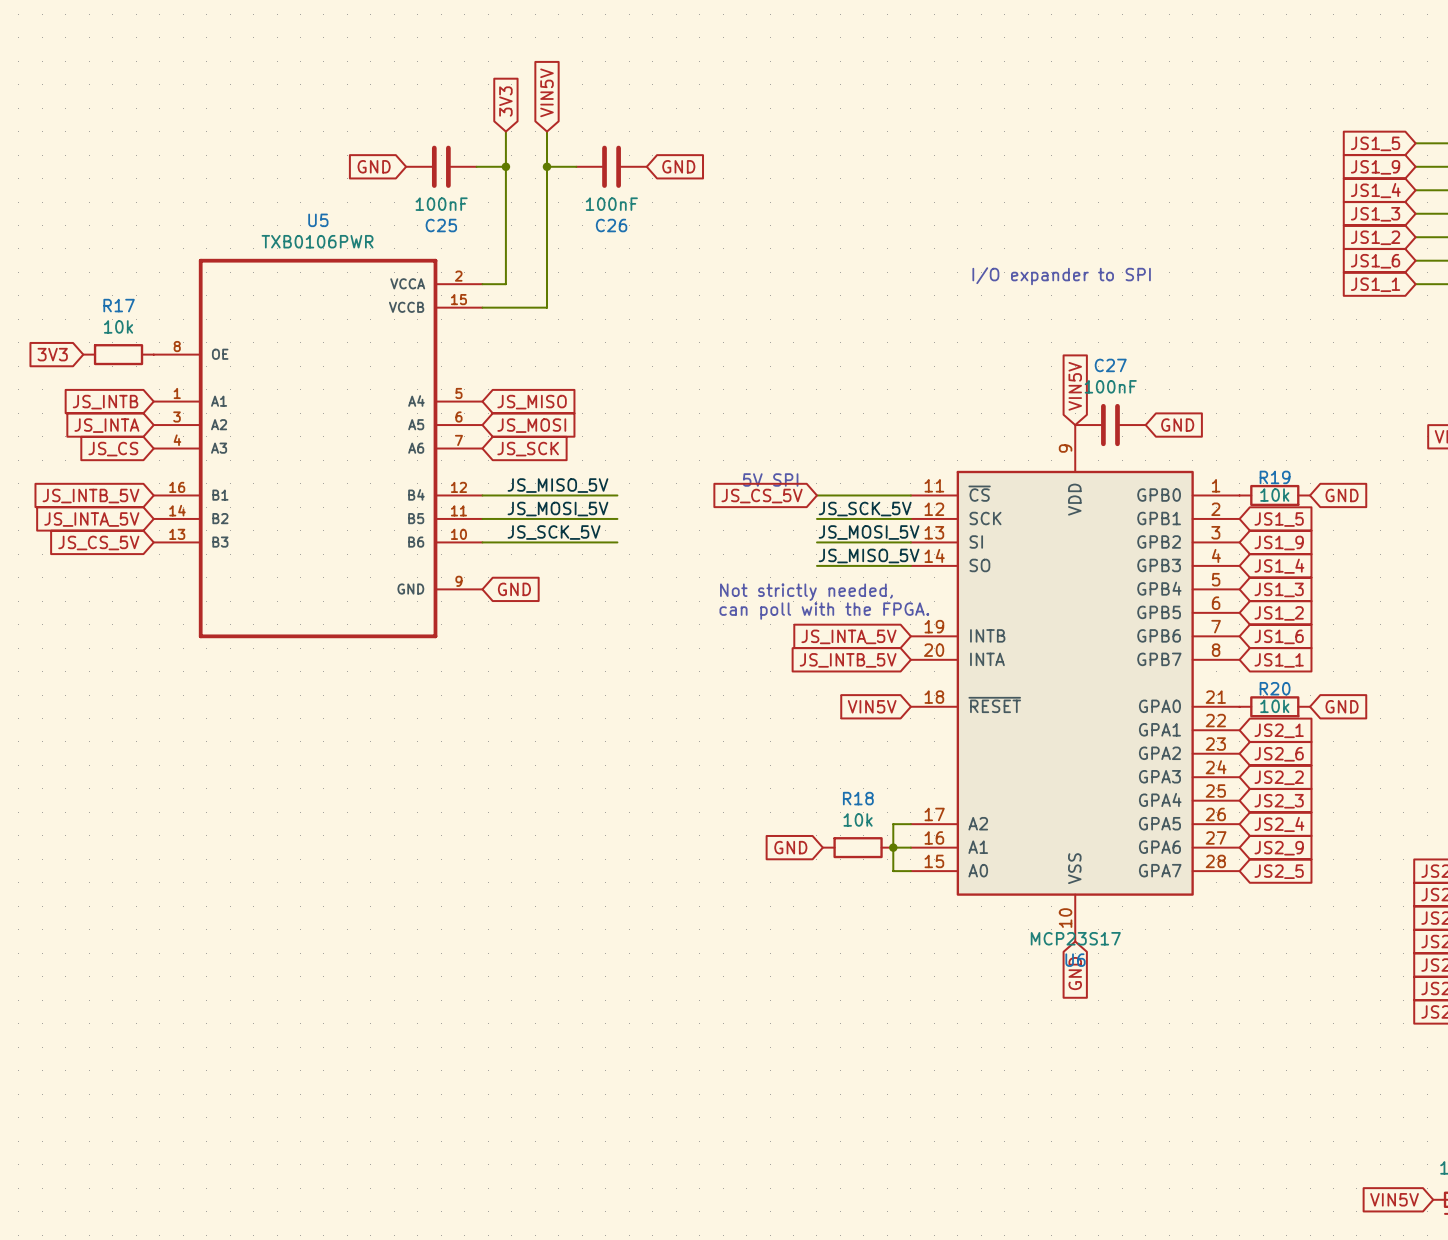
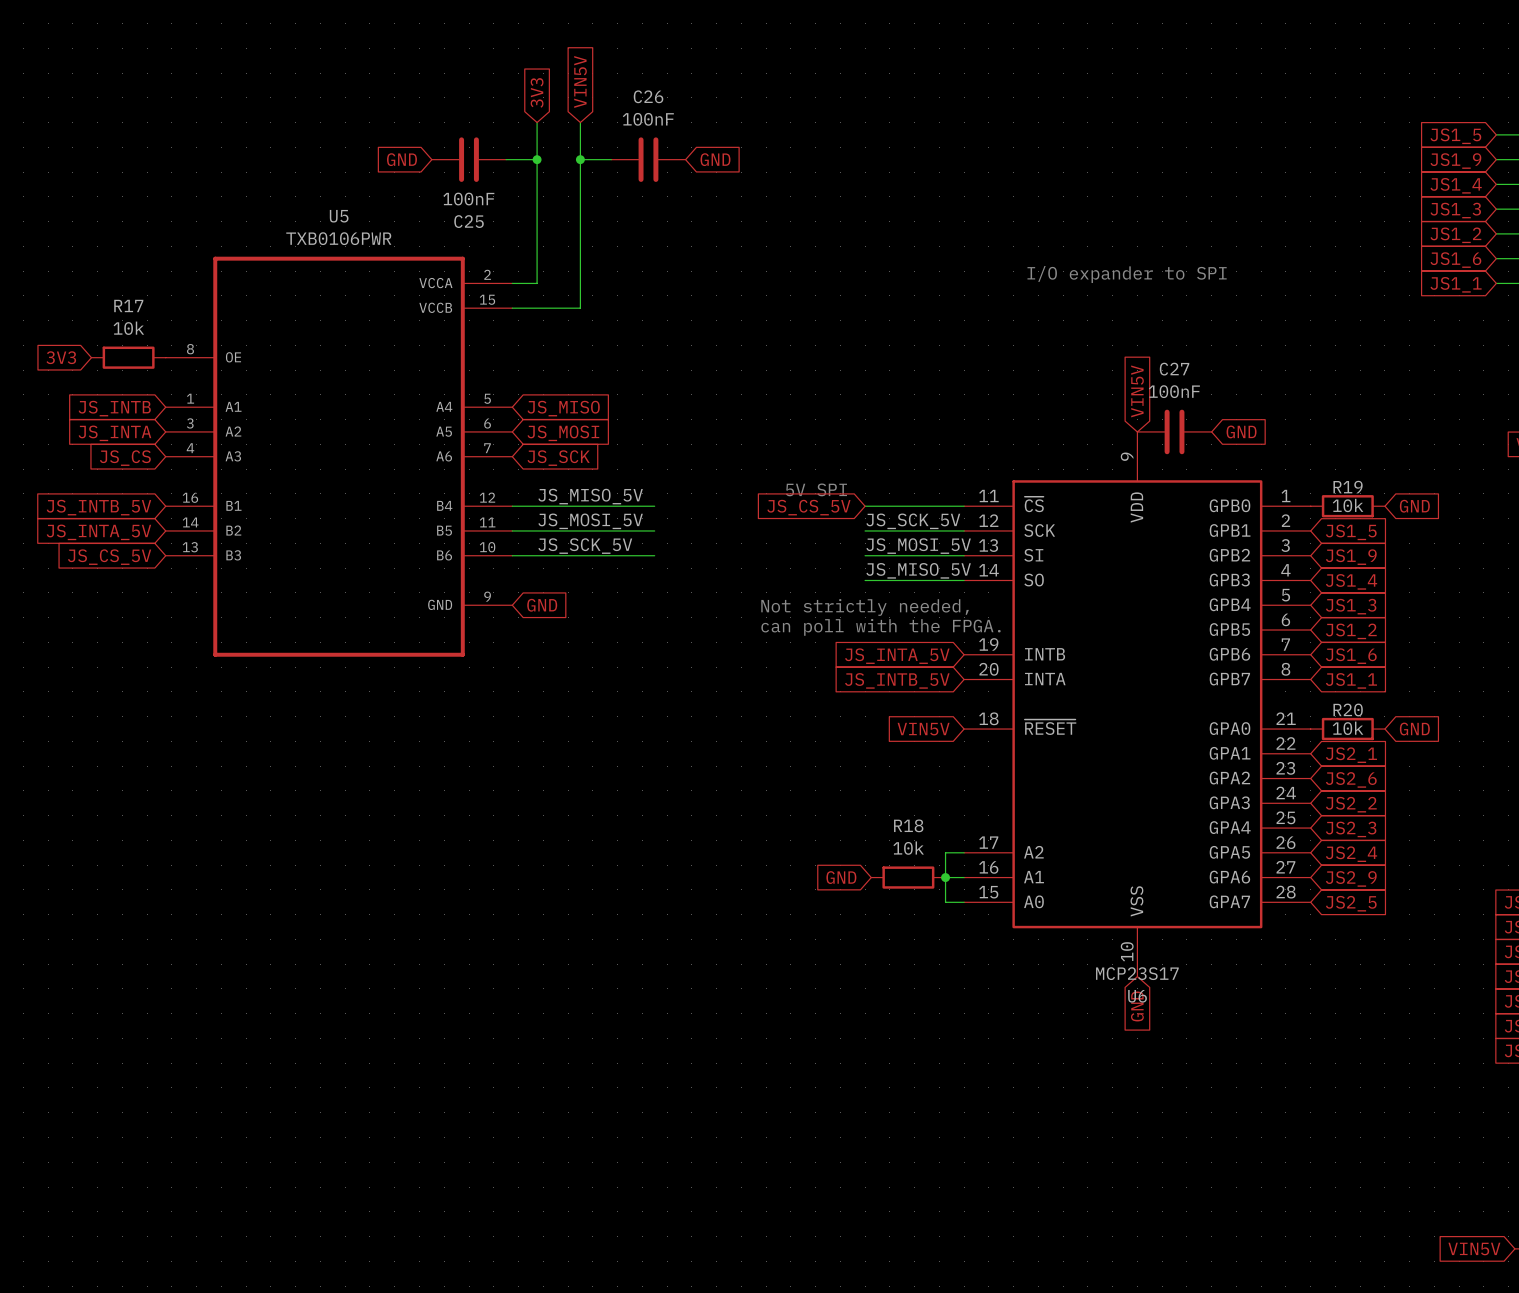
C26 value position: 100nF (611, 204) -> 100nF (648, 119)
C26 name position: C26 (611, 225) -> C26 (648, 96)

